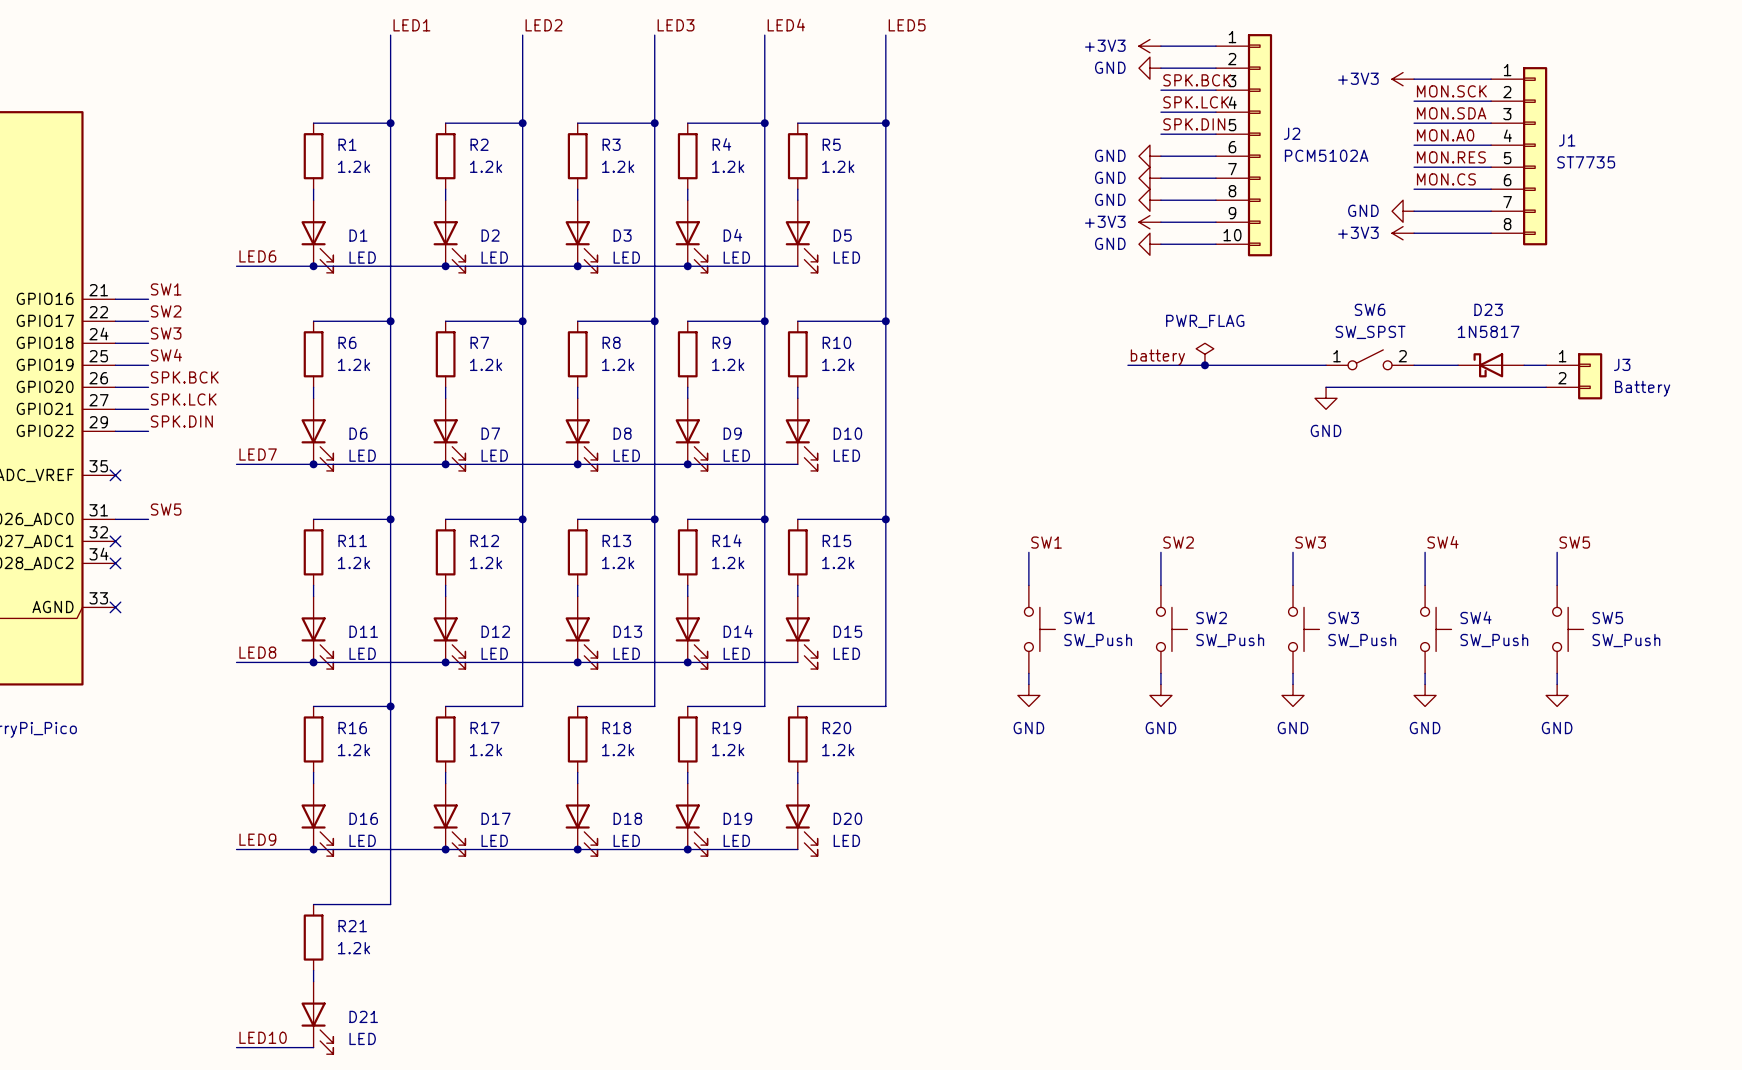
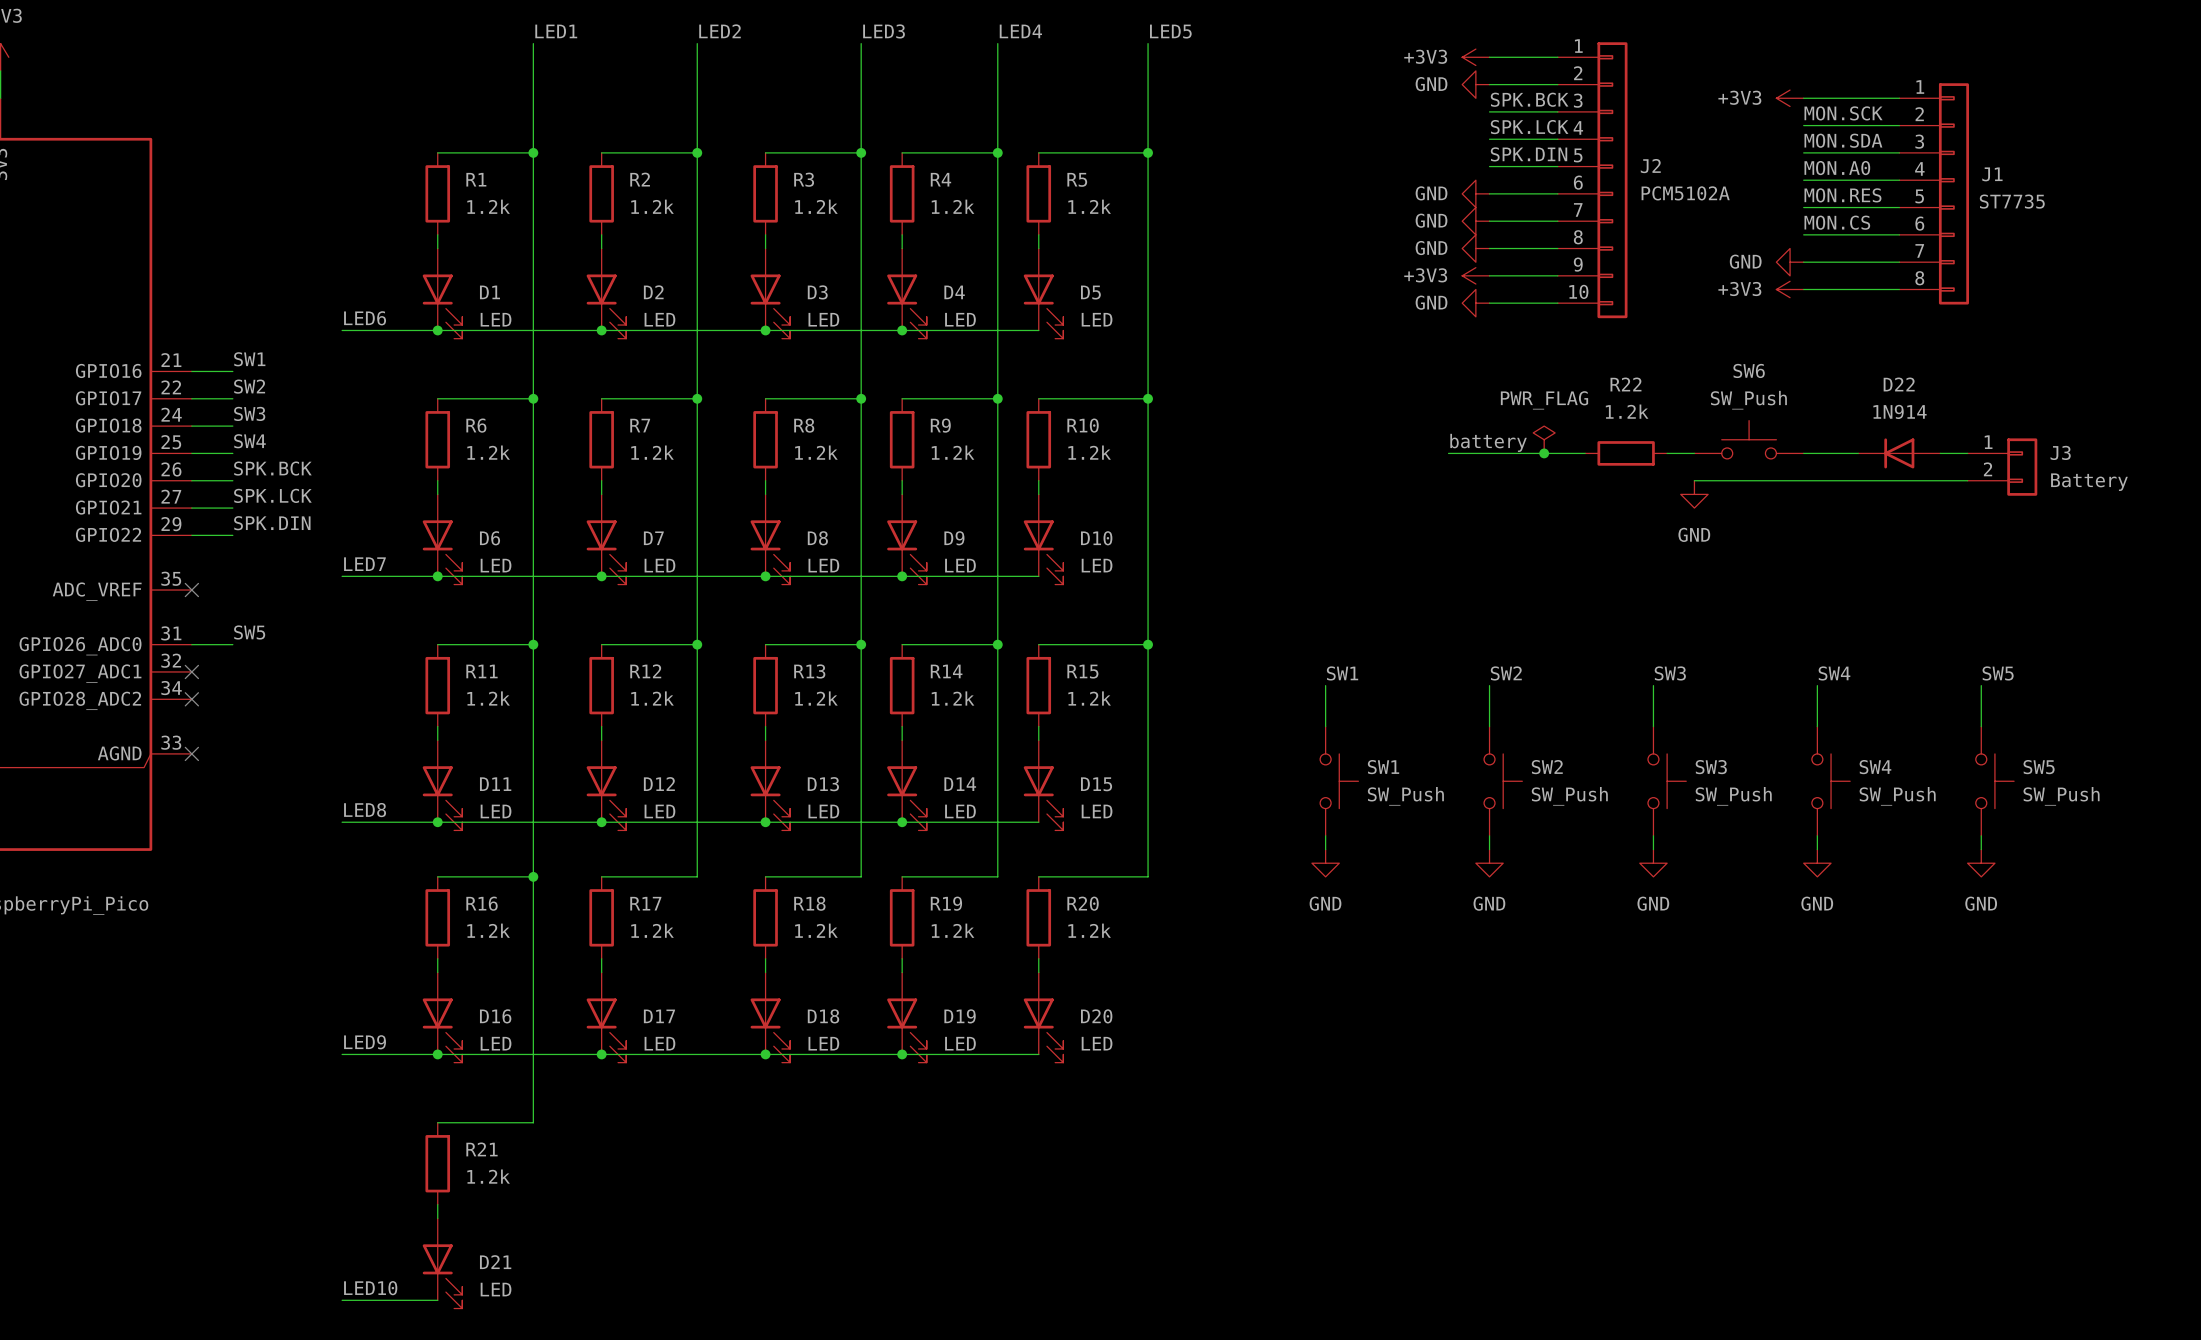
SW6 value: SW_SPST (1370, 332) -> SW_Push (1748, 400)
SW6 symbol: [1326, 349, 1415, 370] -> [1694, 420, 1804, 459]
wire: (1237, 365) (1304, 365) -> none
R22: none -> 1.2k (1626, 453)
D23: 1N5817 (1491, 365) -> none
D22: none -> 1N914 (1899, 453)

